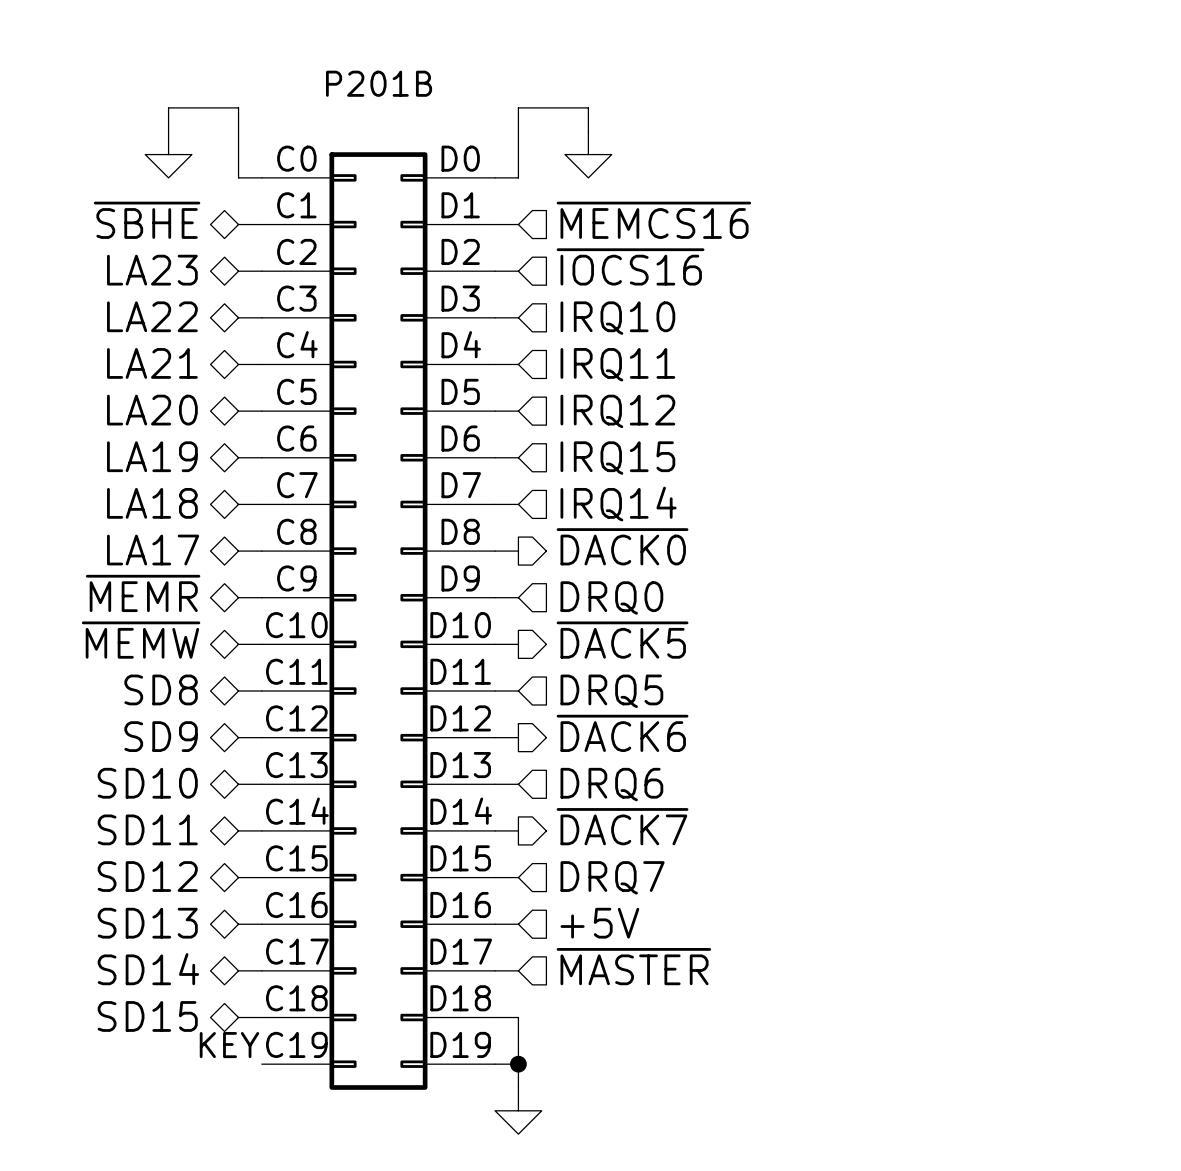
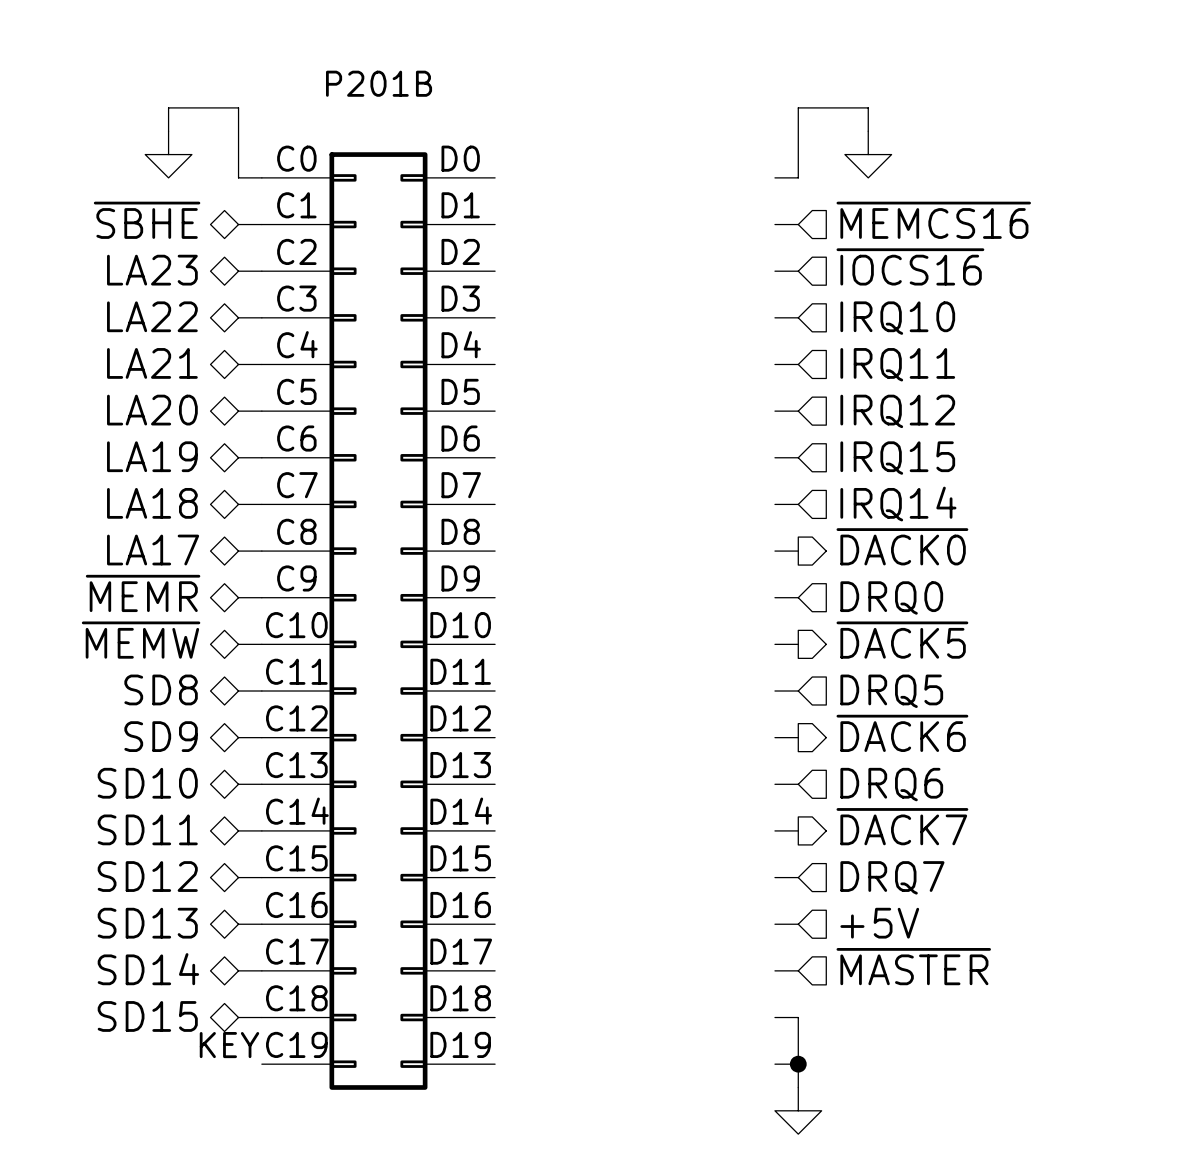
wire: (588, 131) (588, 107) (518, 107) (518, 177) (495, 177) -> (868, 131) (868, 107) (798, 107) (798, 177) (774, 177)
power symbol position: (588, 154) -> (868, 154)
hierarchical label position: ~{MEMCS16} (653, 220) -> ~{MEMCS16} (933, 220)
wire: (495, 224) (518, 224) -> (774, 224) (798, 224)
hierarchical label position: ~{IOCS16} (630, 266) -> ~{IOCS16} (910, 266)
wire: (495, 271) (518, 271) -> (774, 271) (798, 271)
wire: (495, 317) (518, 317) -> (774, 317) (798, 317)
hierarchical label position: IRQ10 (617, 318) -> IRQ10 (897, 318)
wire: (495, 364) (518, 364) -> (774, 364) (798, 364)
hierarchical label position: IRQ11 (617, 364) -> IRQ11 (897, 364)
wire: (495, 411) (518, 411) -> (774, 411) (798, 411)
hierarchical label position: IRQ12 (617, 411) -> IRQ12 (897, 411)
wire: (495, 457) (518, 457) -> (774, 457) (798, 457)
hierarchical label position: IRQ15 (617, 458) -> IRQ15 (897, 458)
wire: (495, 504) (518, 504) -> (774, 504) (798, 504)
hierarchical label position: IRQ14 (618, 504) -> IRQ14 (898, 504)
hierarchical label position: ~{DACK0} (622, 546) -> ~{DACK0} (902, 546)
wire: (495, 551) (518, 551) -> (774, 551) (798, 551)
wire: (495, 597) (518, 597) -> (774, 597) (798, 597)
hierarchical label position: DRQ0 (611, 597) -> DRQ0 (891, 597)
hierarchical label position: ~{DACK5} (622, 640) -> ~{DACK5} (902, 640)
wire: (495, 644) (518, 644) -> (774, 644) (798, 644)
wire: (495, 691) (518, 691) -> (774, 691) (798, 691)
hierarchical label position: DRQ5 (611, 691) -> DRQ5 (891, 691)
hierarchical label position: ~{DACK6} (622, 733) -> ~{DACK6} (902, 733)
wire: (495, 737) (518, 737) -> (774, 737) (798, 737)
wire: (495, 784) (518, 784) -> (774, 784) (798, 784)
hierarchical label position: DRQ6 (611, 784) -> DRQ6 (891, 784)
hierarchical label position: ~{DACK7} (622, 826) -> ~{DACK7} (902, 826)
wire: (495, 830) (518, 830) -> (774, 830) (798, 830)
wire: (495, 877) (518, 877) -> (774, 877) (798, 877)
hierarchical label position: DRQ7 (612, 877) -> DRQ7 (892, 877)
hierarchical label position: +5V (599, 923) -> +5V (879, 923)
wire: (495, 924) (518, 924) -> (774, 924) (798, 924)
hierarchical label position: ~{MASTER} (633, 966) -> ~{MASTER} (913, 966)
wire: (495, 970) (518, 970) -> (774, 970) (798, 970)
wire: (495, 1017) (518, 1017) (518, 1087) -> (774, 1017) (798, 1017) (798, 1087)
wire: (495, 1064) (518, 1064) -> (774, 1064) (798, 1064)
junction: (518, 1064) -> none
junction: none -> (798, 1064)
power symbol position: (518, 1110) -> (798, 1110)

